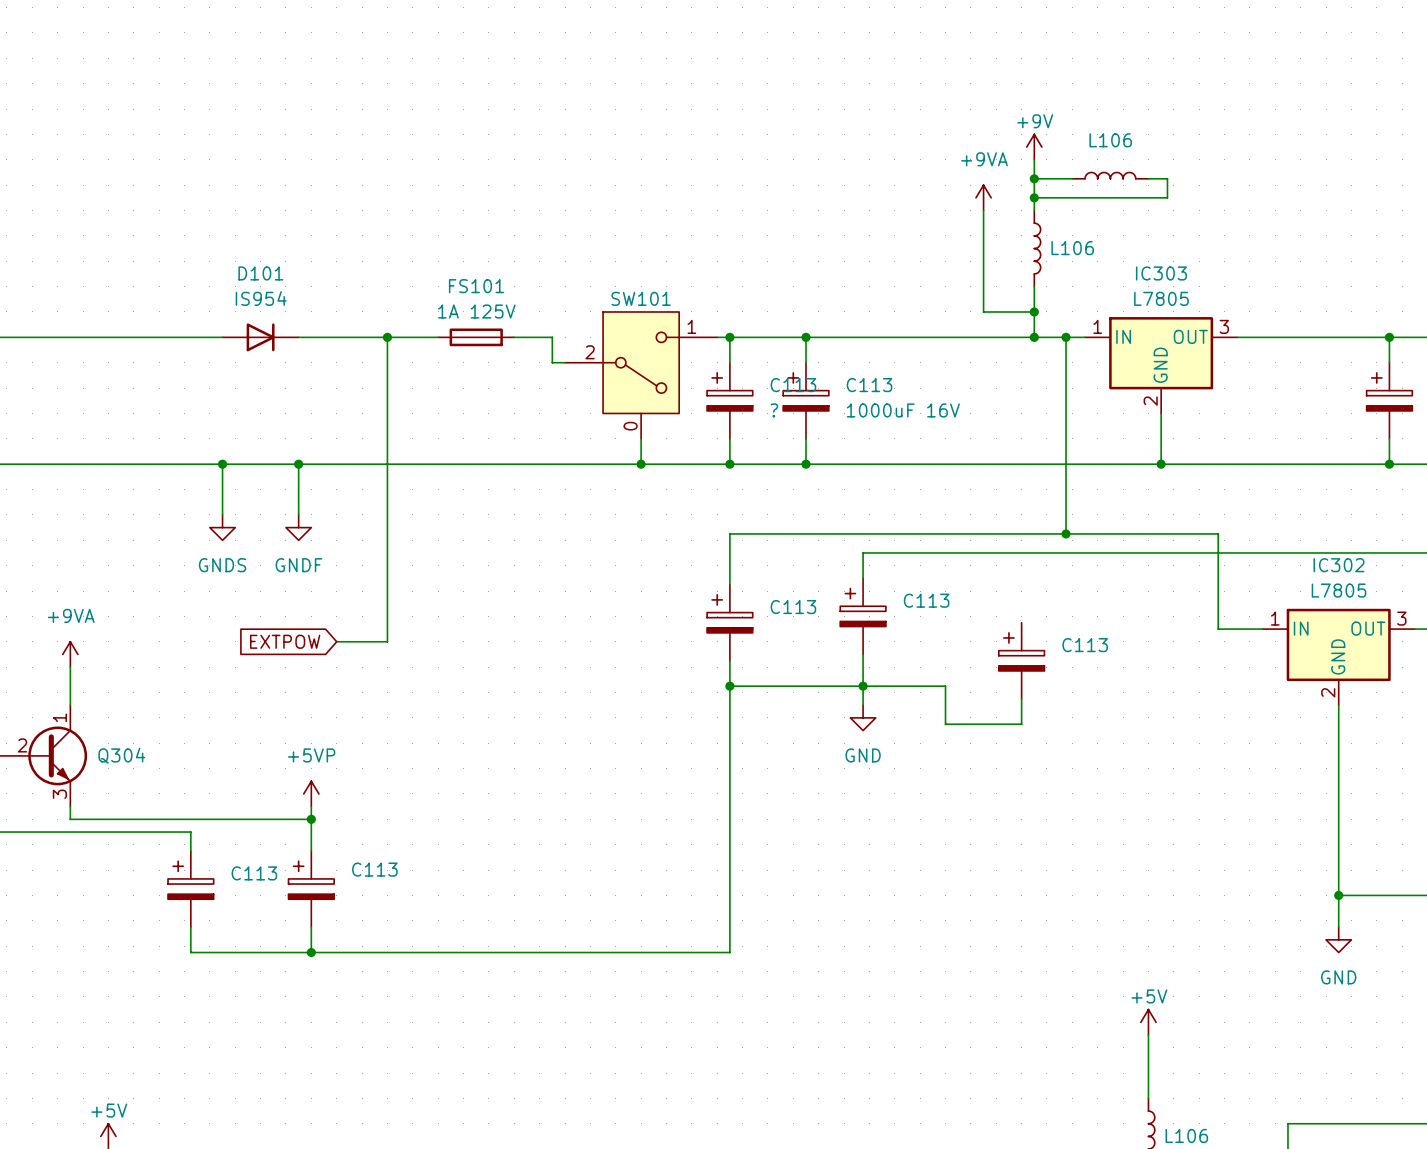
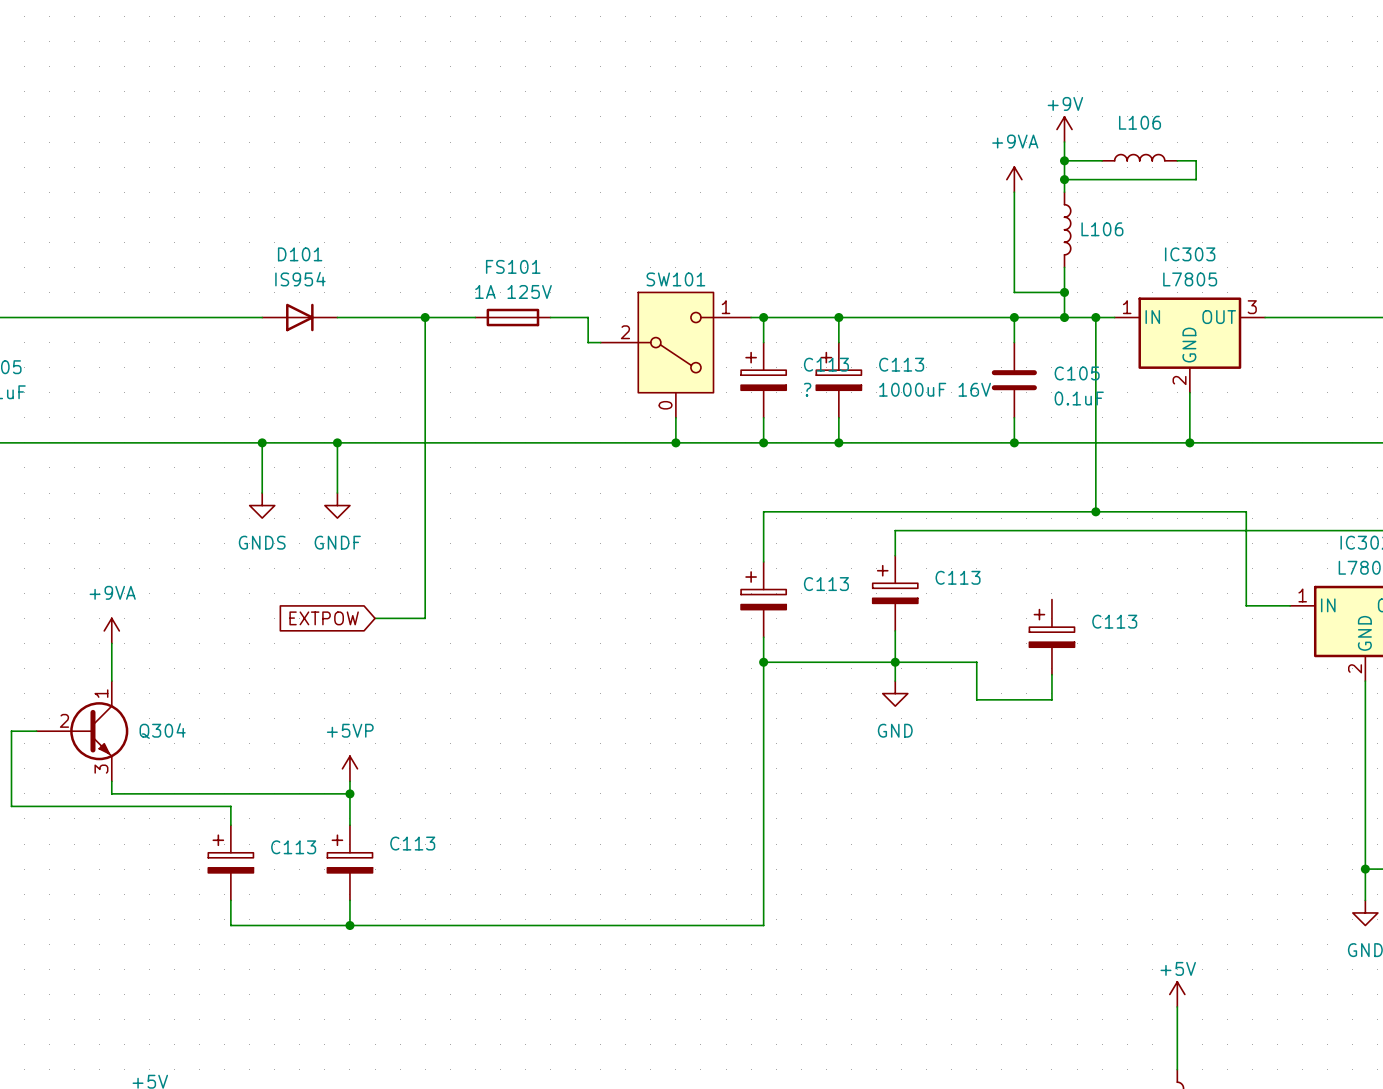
wire: none -> (1014, 317) (1014, 342)
junction: none -> (1014, 317)
C105: none -> 0.1uF (1014, 380)
wire: none -> (1014, 417) (1014, 442)
junction: none -> (1014, 442)

